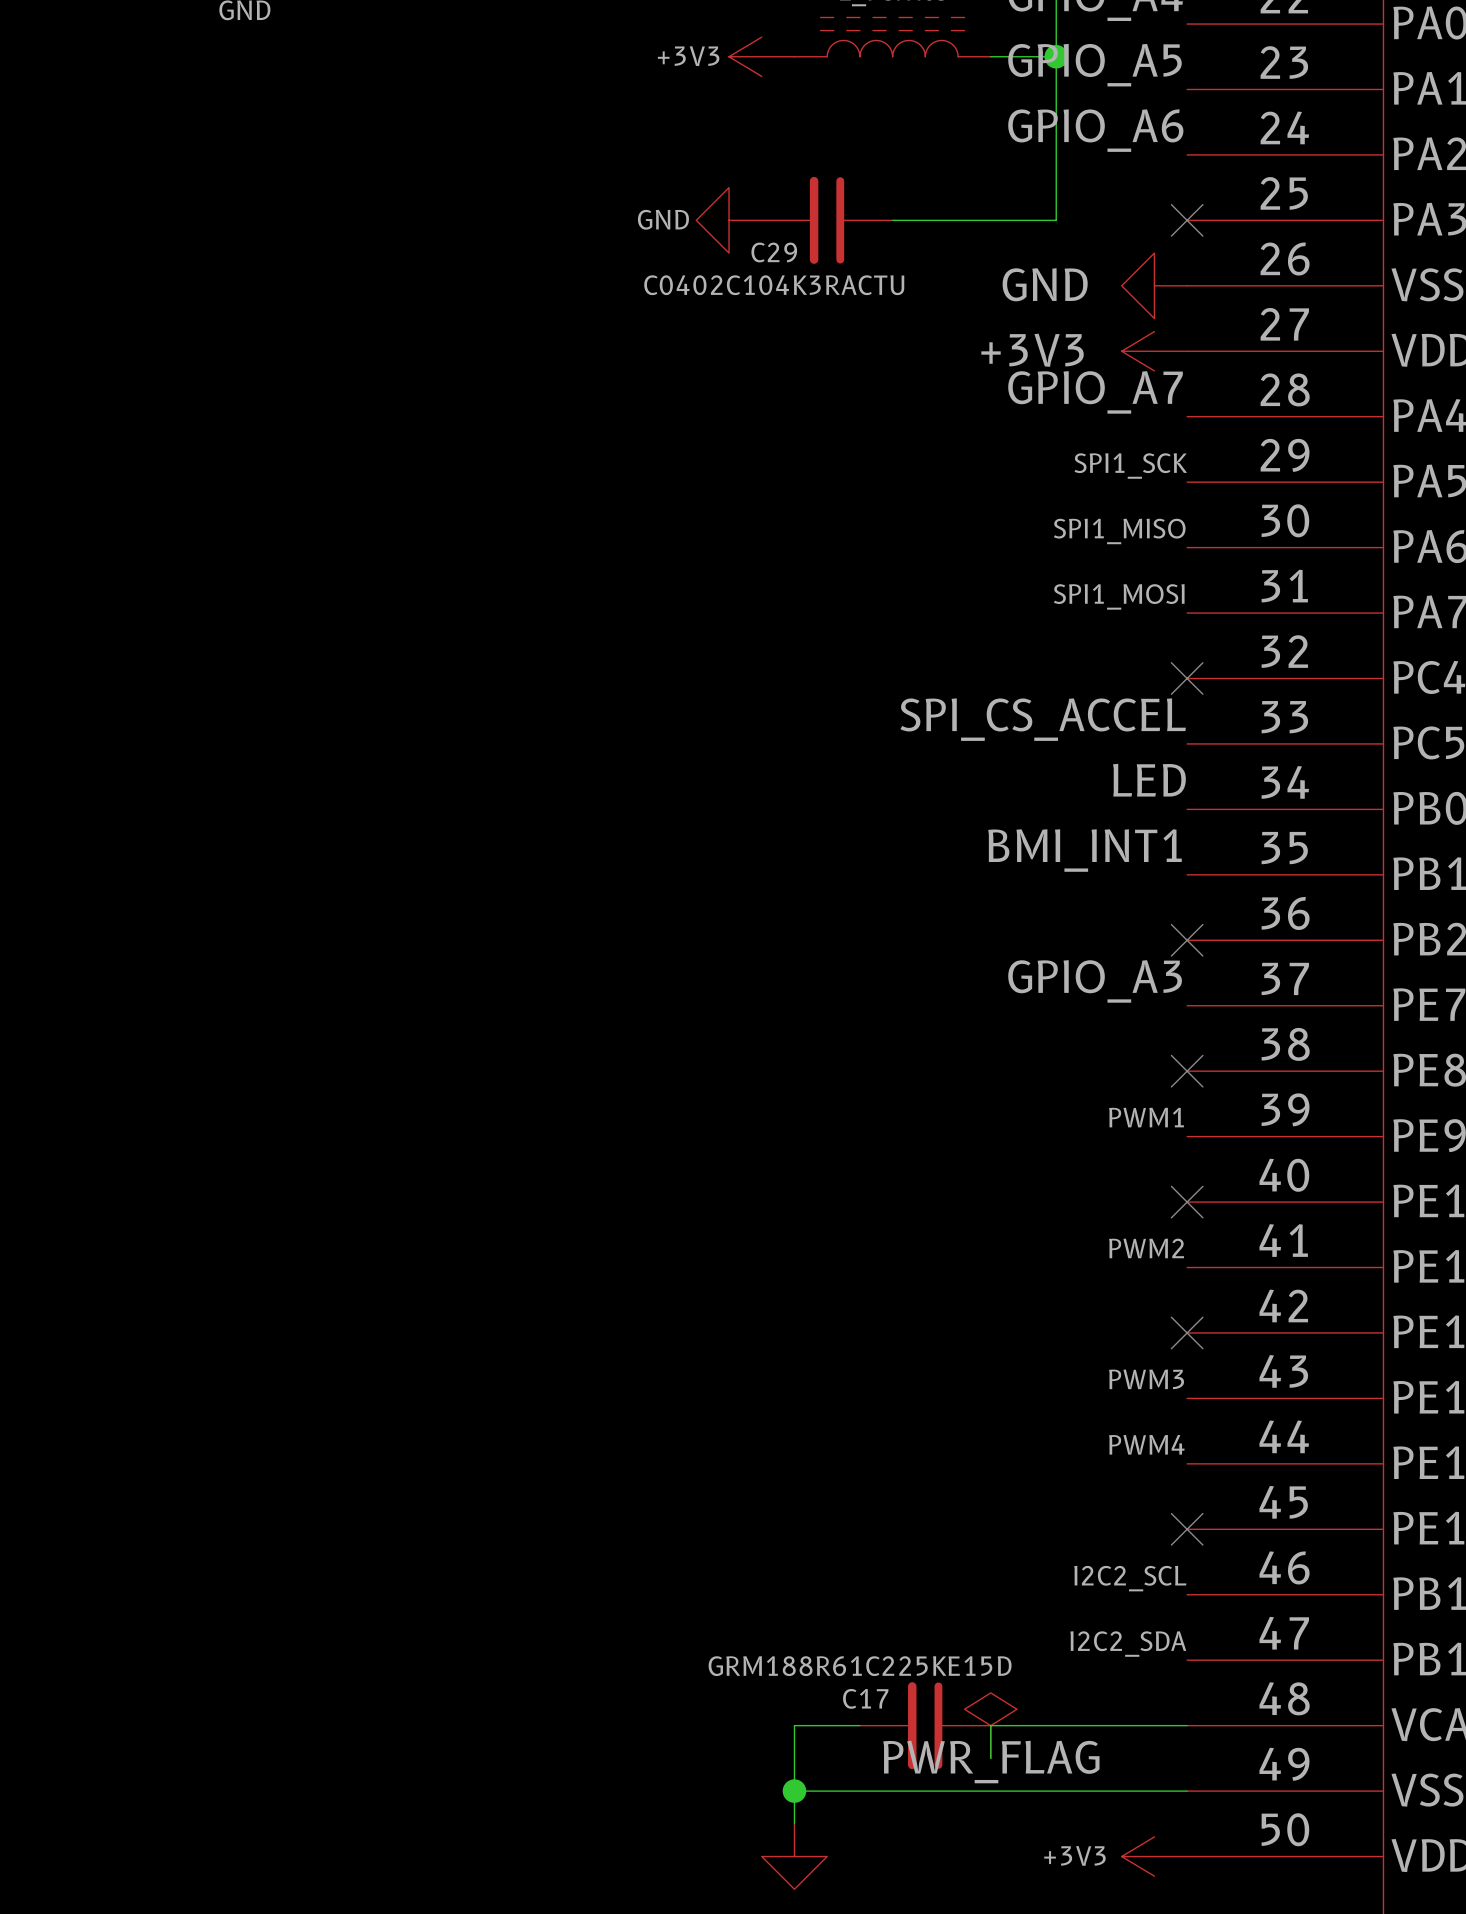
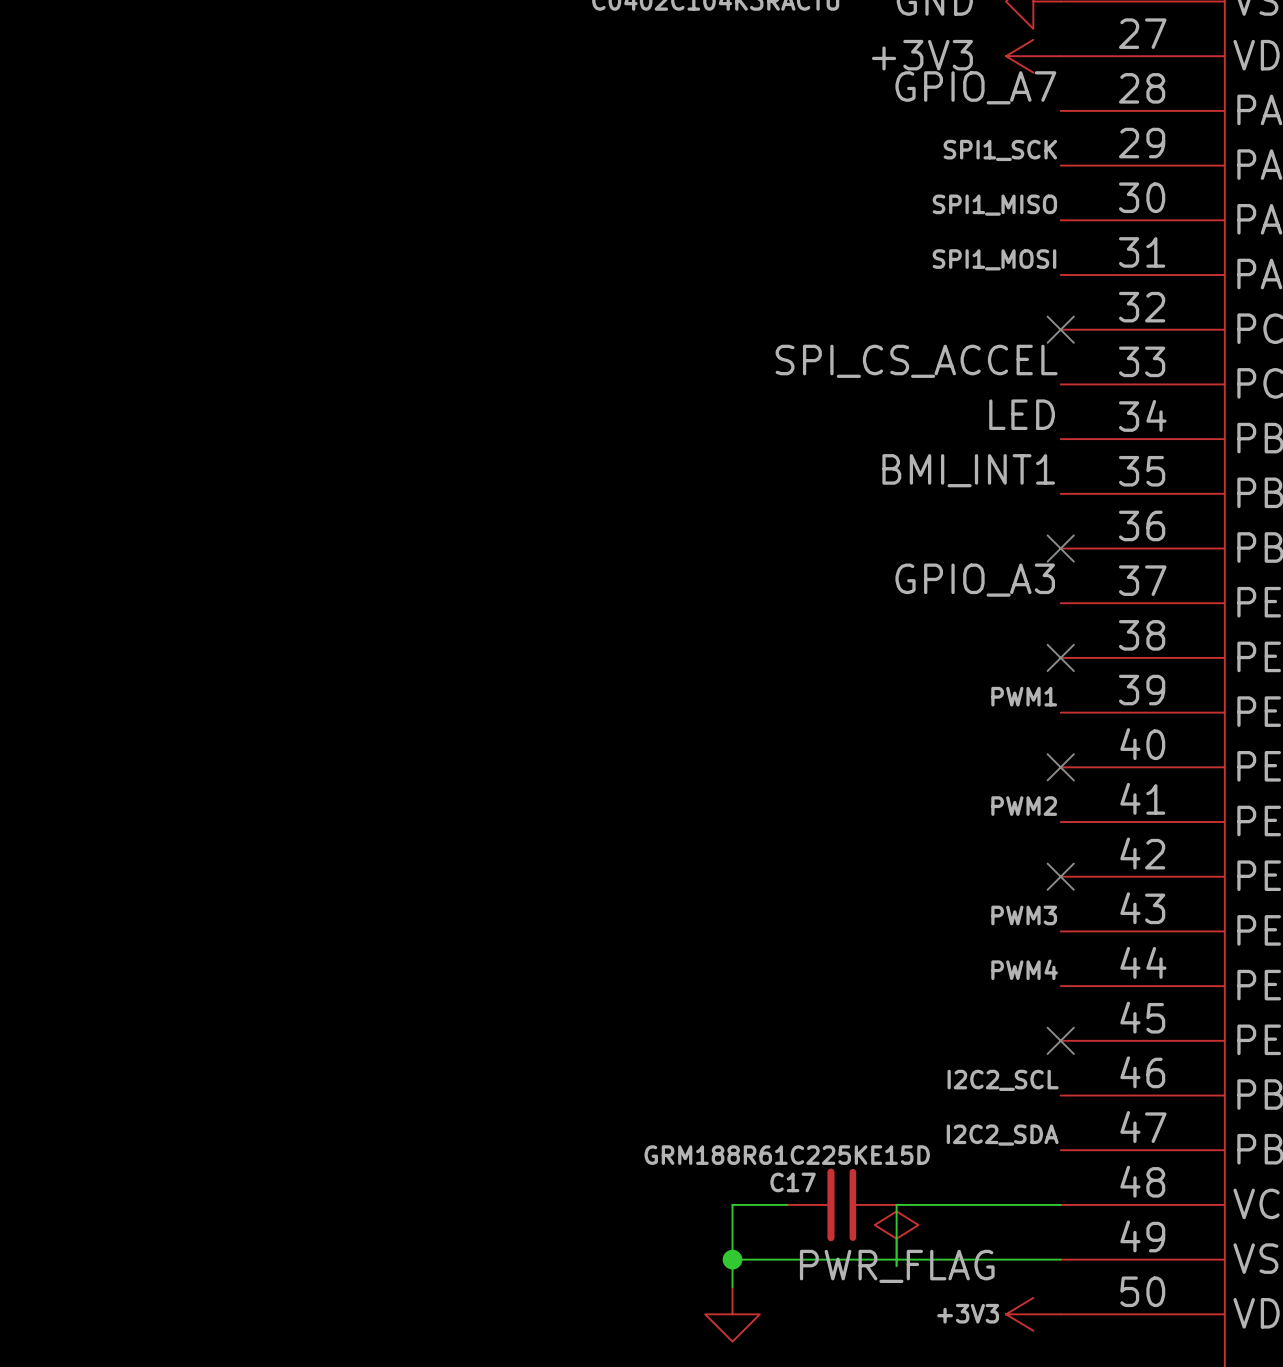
power symbol position: PWR_FLAG (990, 1725) -> PWR_FLAG (896, 1238)
wire: none -> (896, 1232) (896, 1266)

